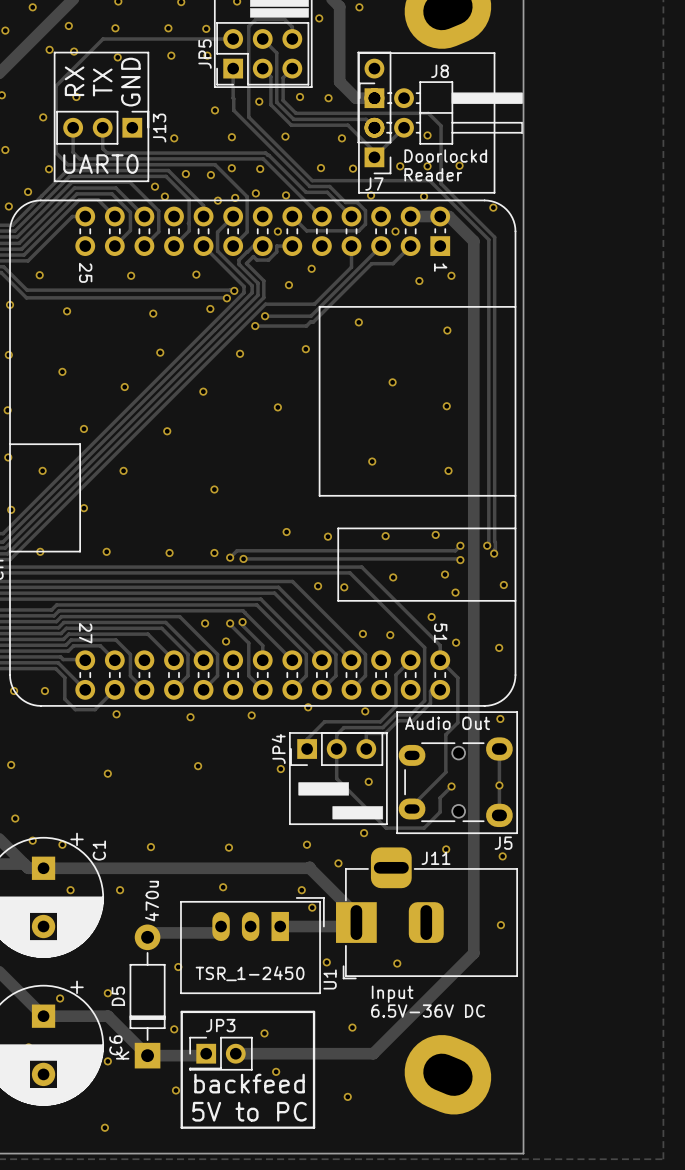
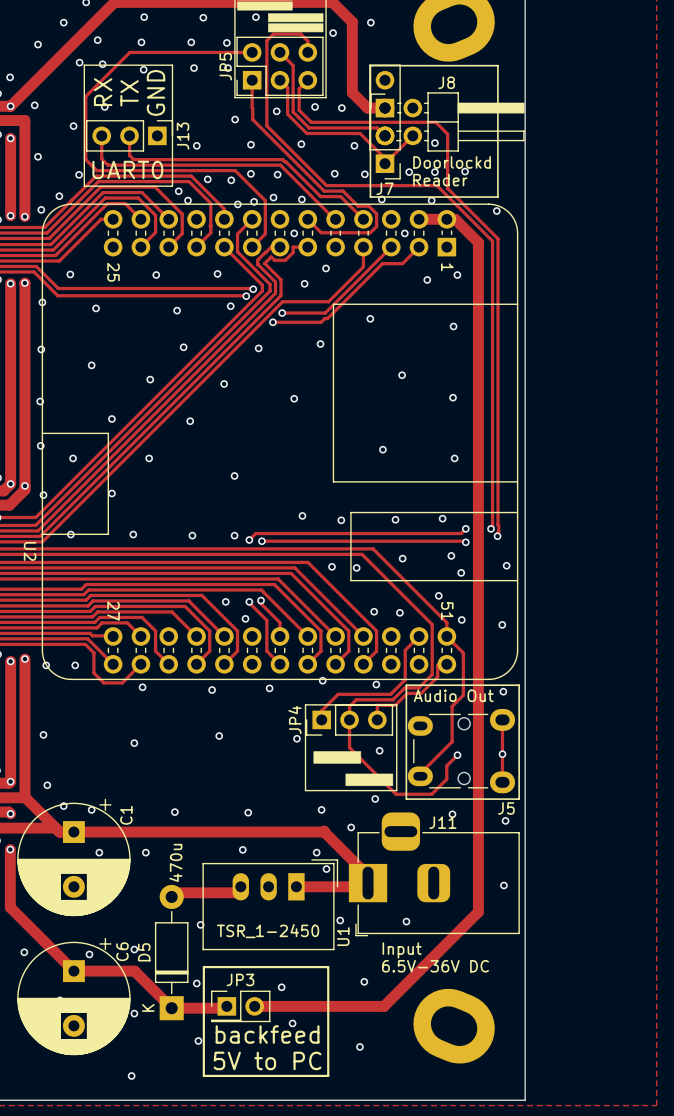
C6 name position: C6 (115, 1045) -> C6 (122, 951)

